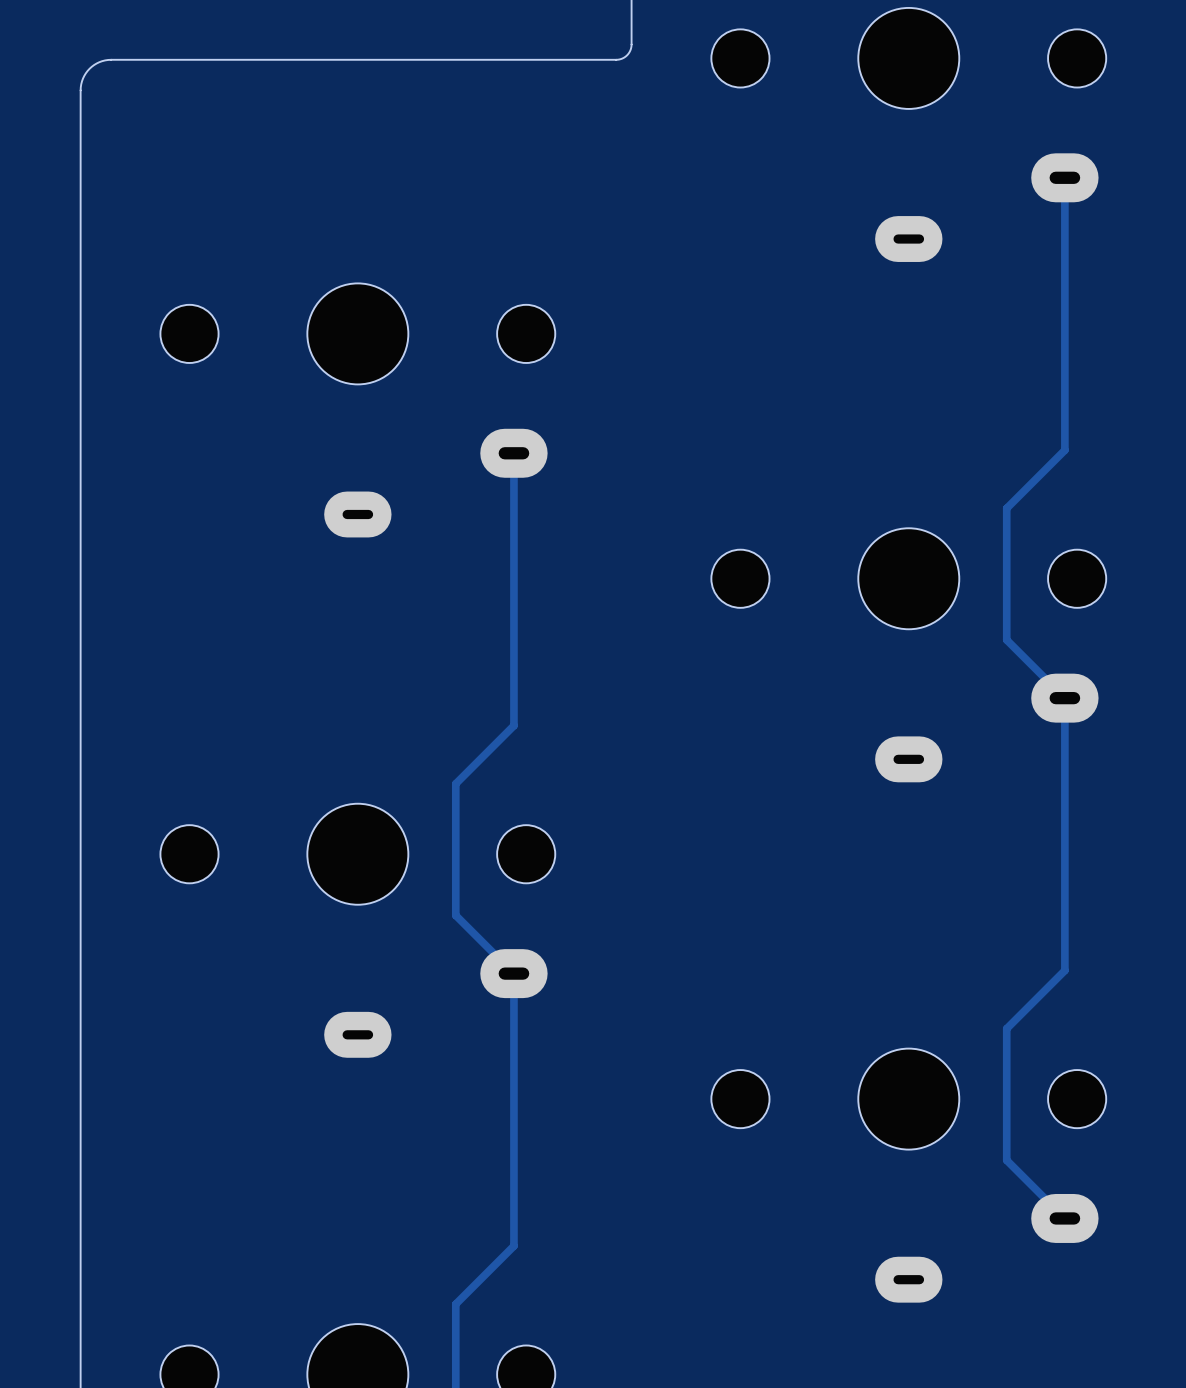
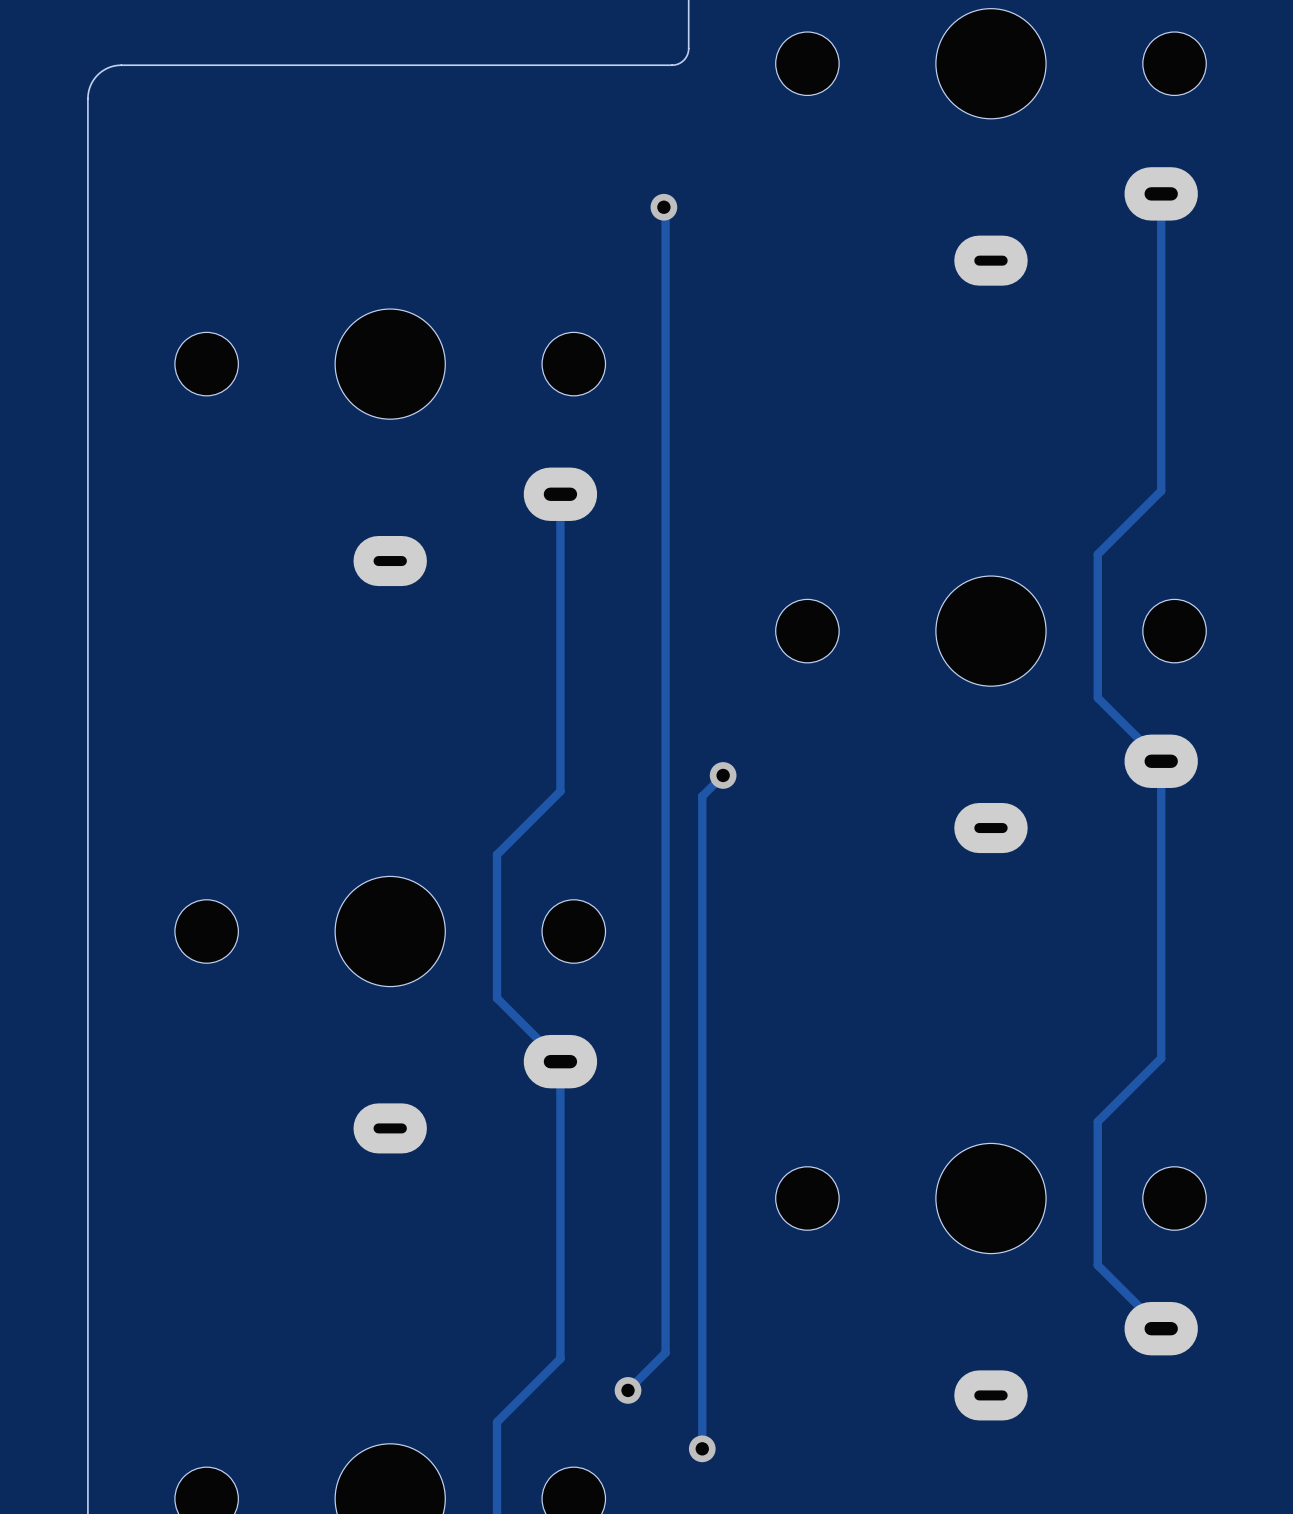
track: none -> (663, 207) (665, 208) (665, 1352) (628, 1390)
via: none -> (663, 207)
track: none -> (723, 775) (702, 796) (702, 1448)
via: none -> (723, 775)
via: none -> (628, 1390)
via: none -> (702, 1448)

